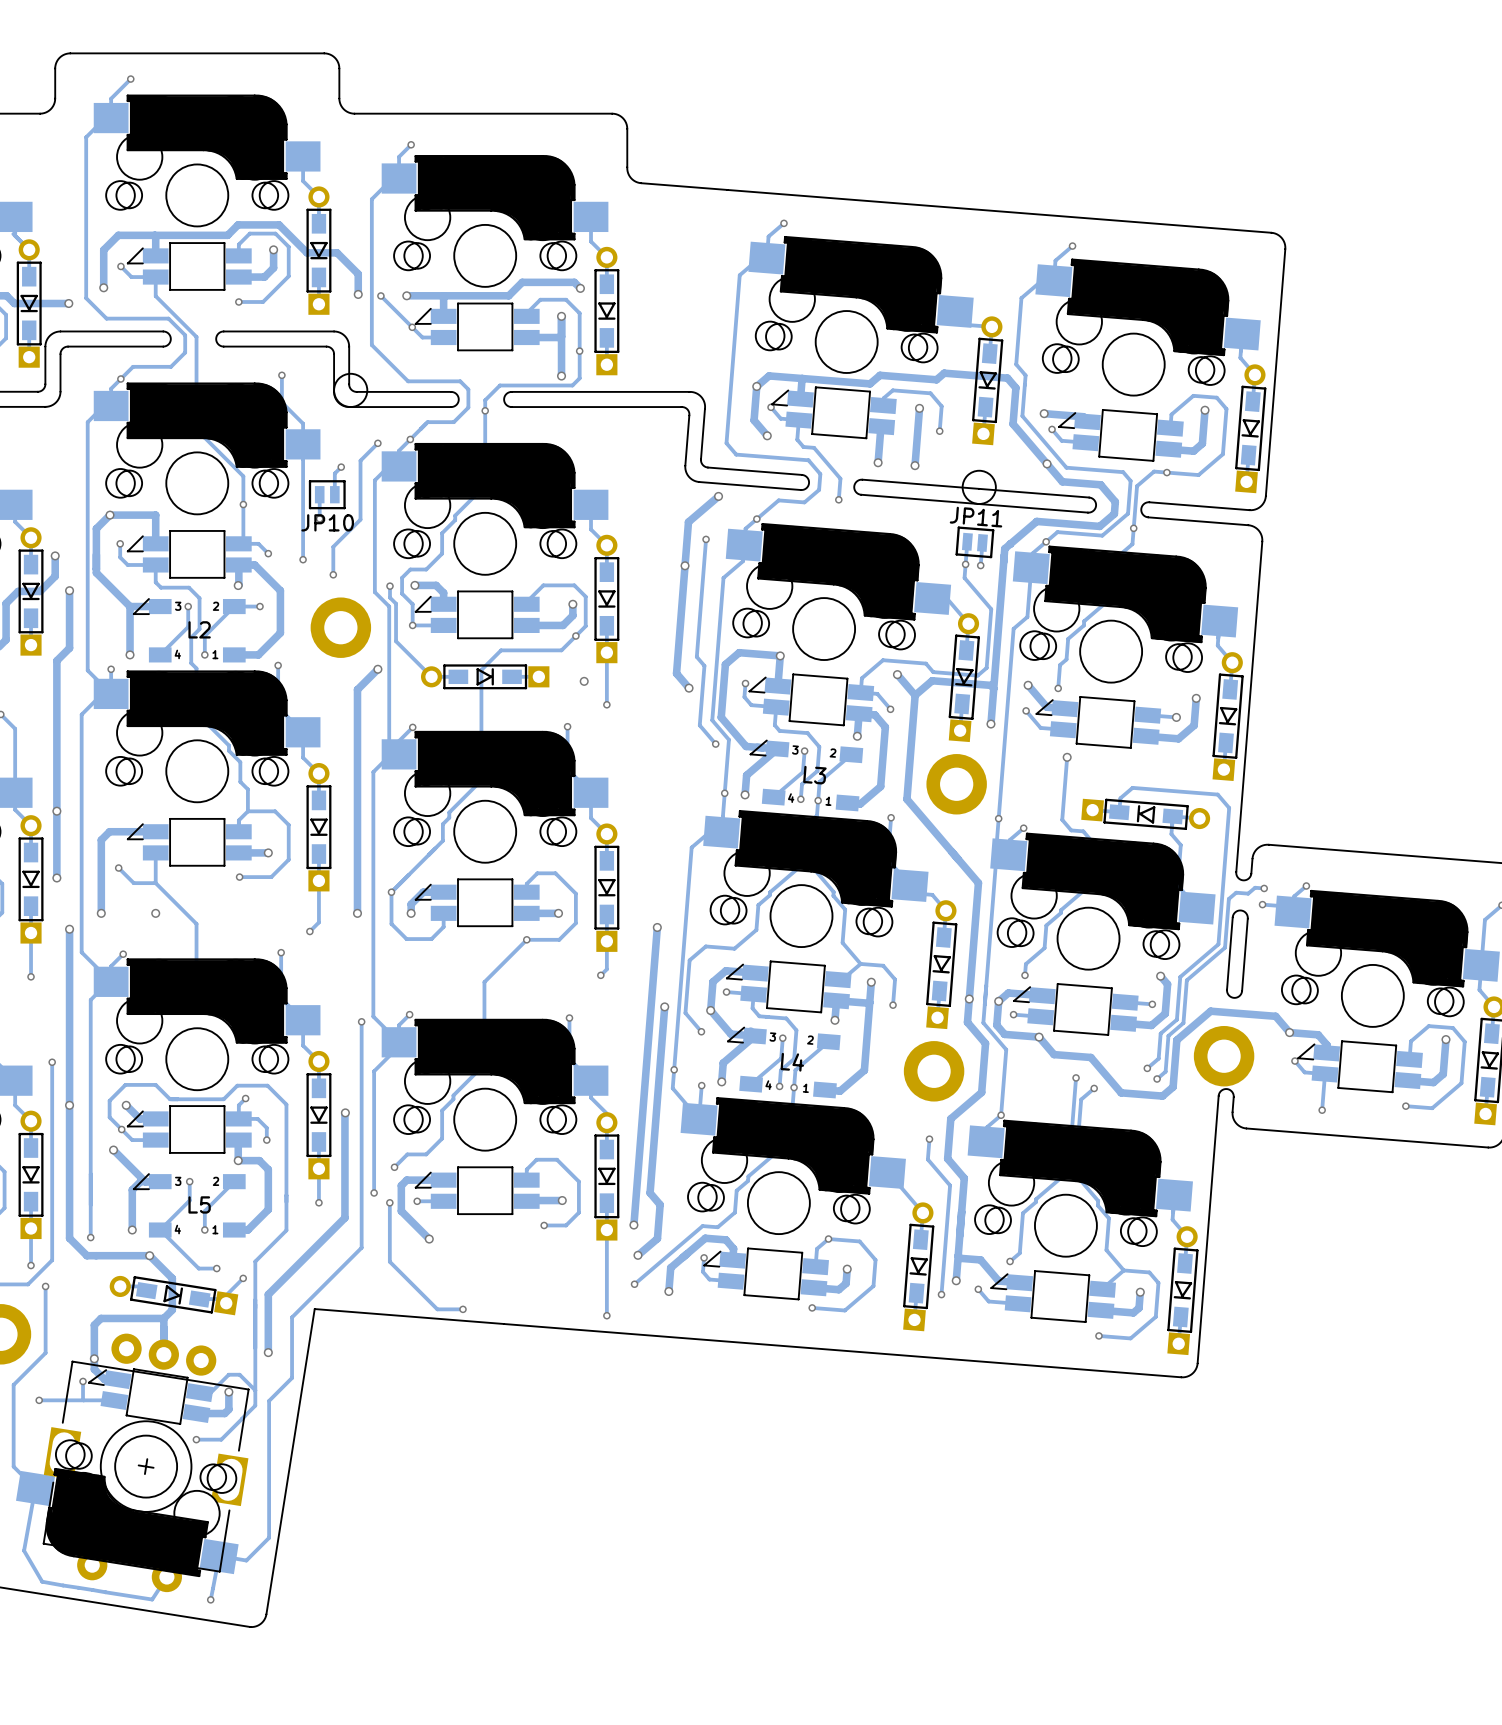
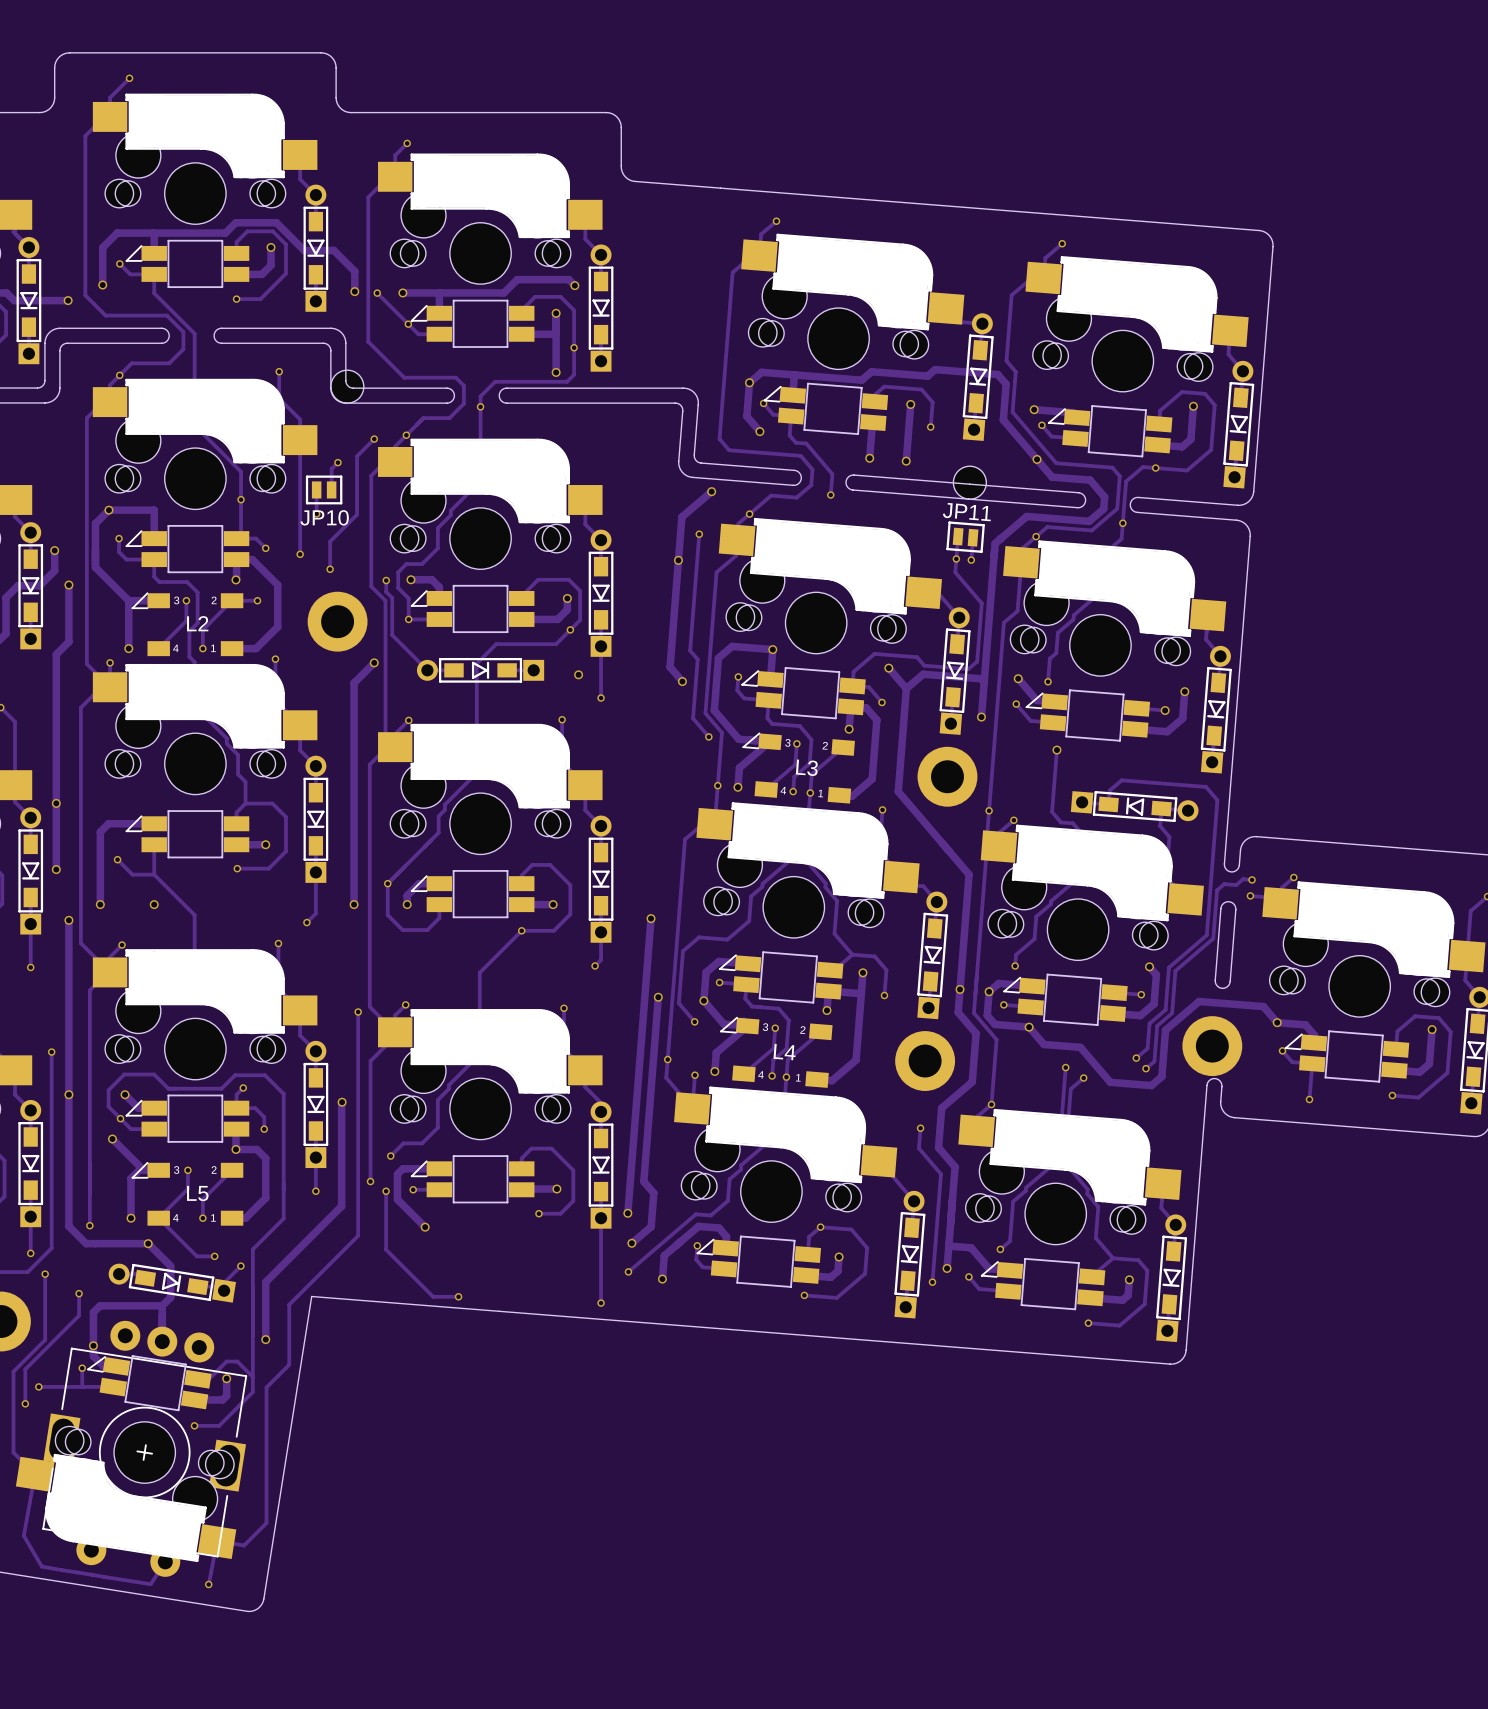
track: none -> (79, 1293) (79, 1315) (25, 1369) (25, 1403)
via: none -> (79, 1293)
via: none -> (25, 1403)

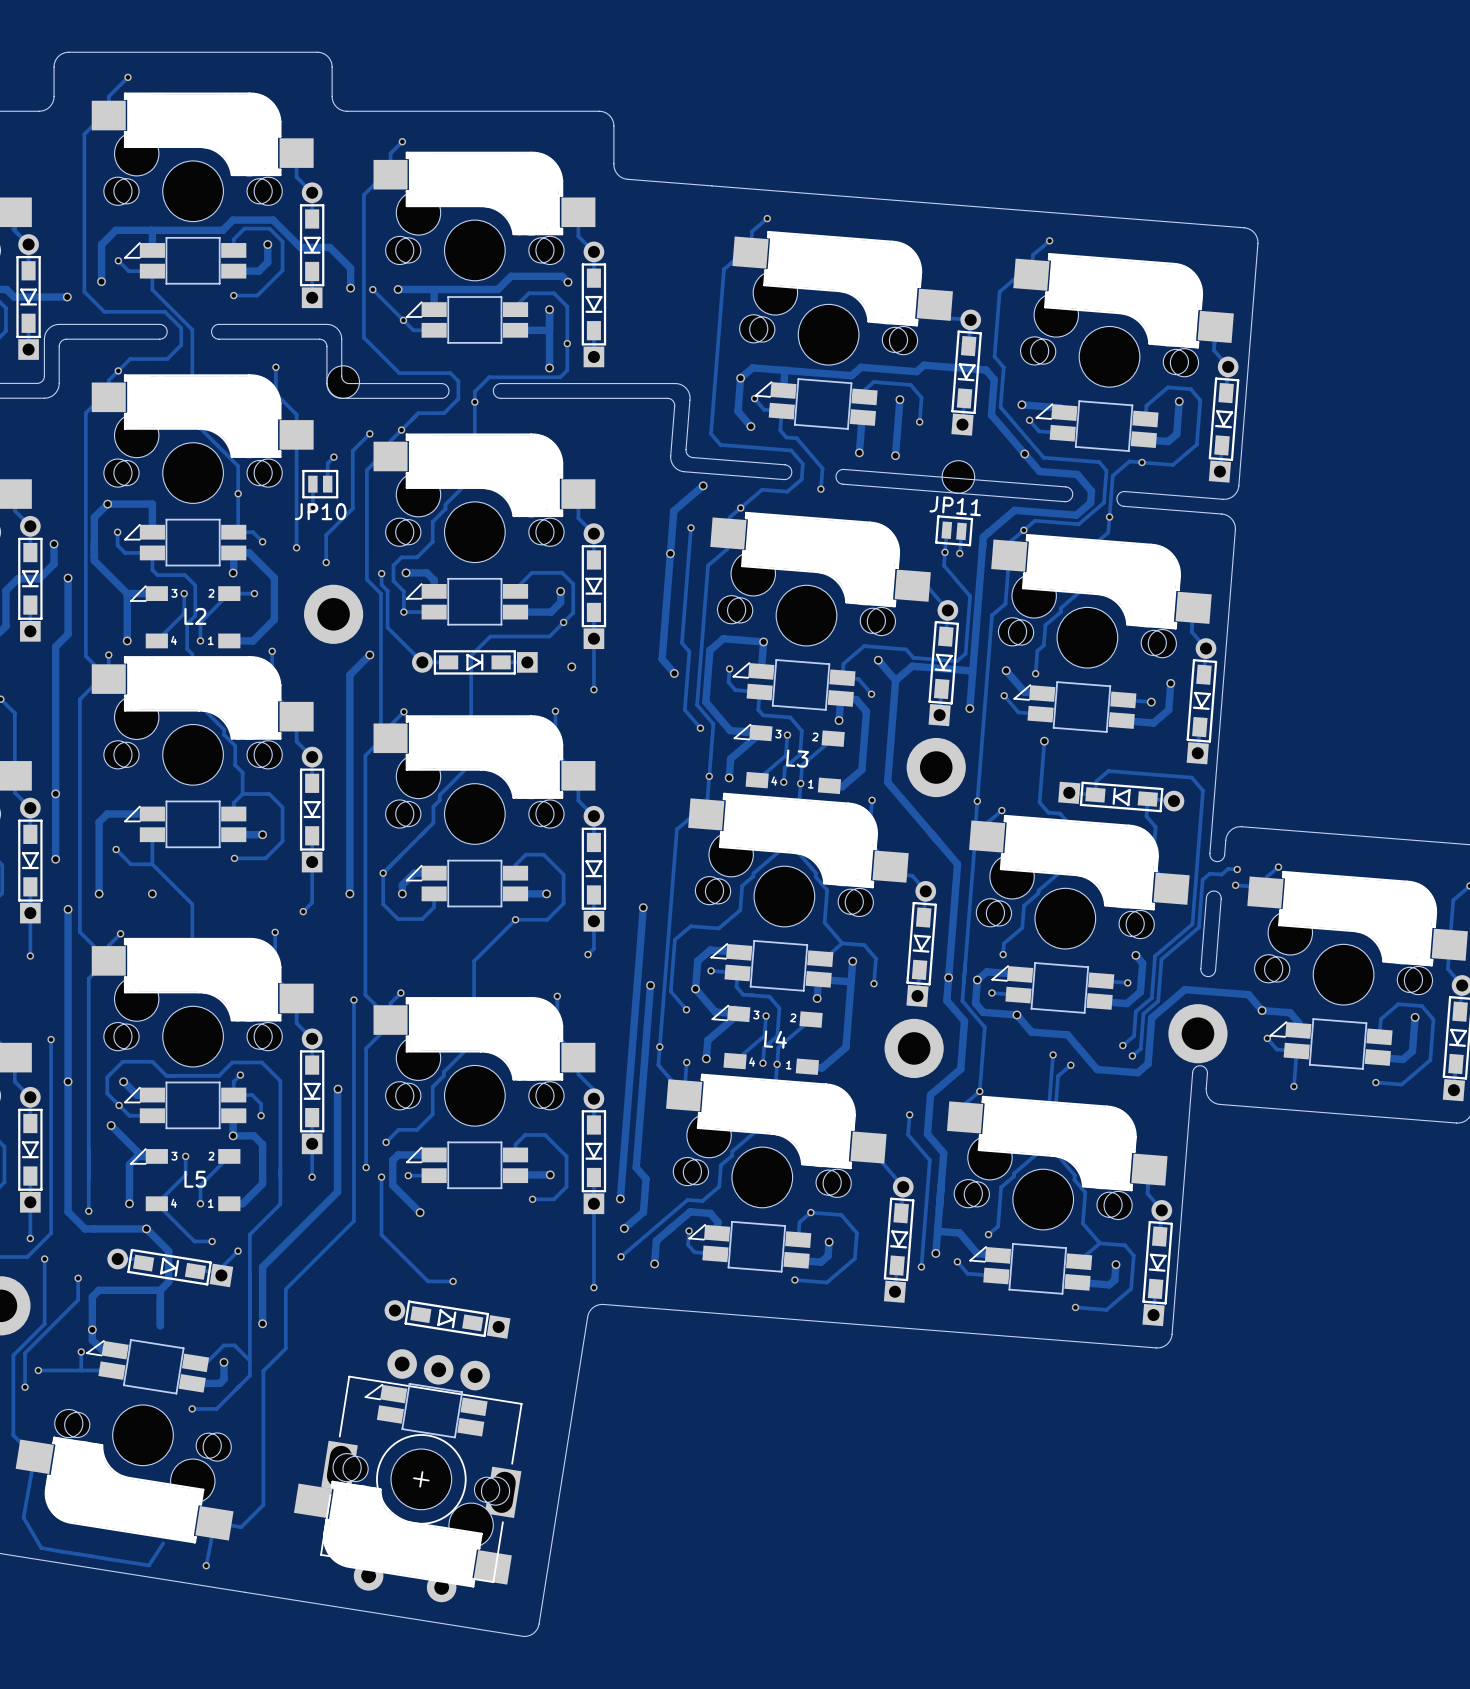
part: none -> (447, 1319)
board edge: (1170, 1364) (311, 1296) (263, 1598) (258, 1608) (247, 1611) -> (1156, 1347) (597, 1305) (591, 1309) (587, 1315) (539, 1623) (533, 1633) (523, 1636) (244, 1592)
part: none -> (426, 1410)
part position: (144, 1448) -> (421, 1475)
part: none -> (402, 1518)

